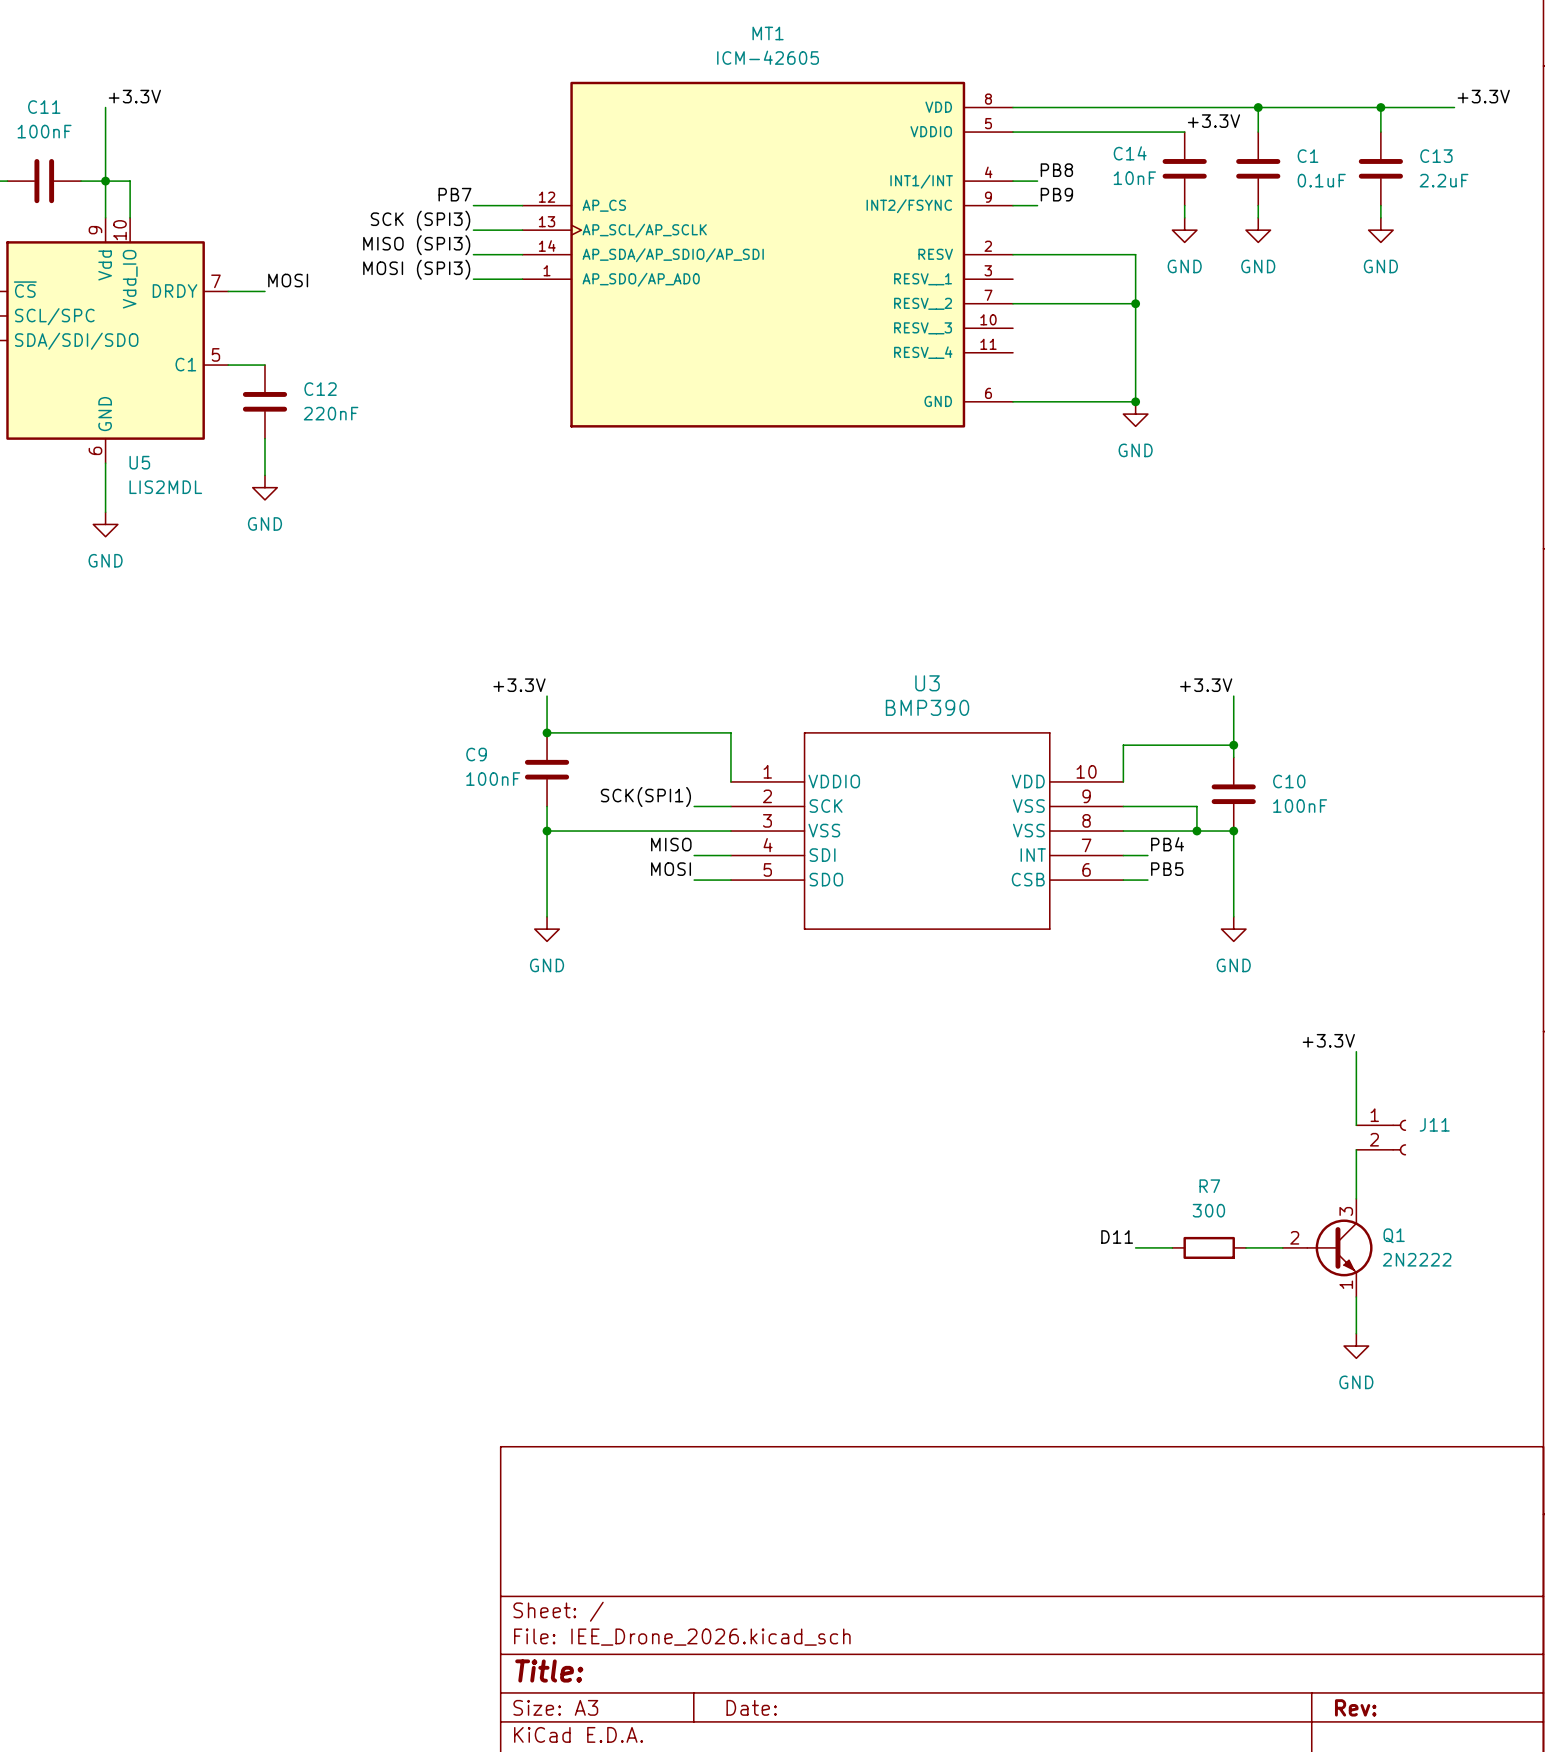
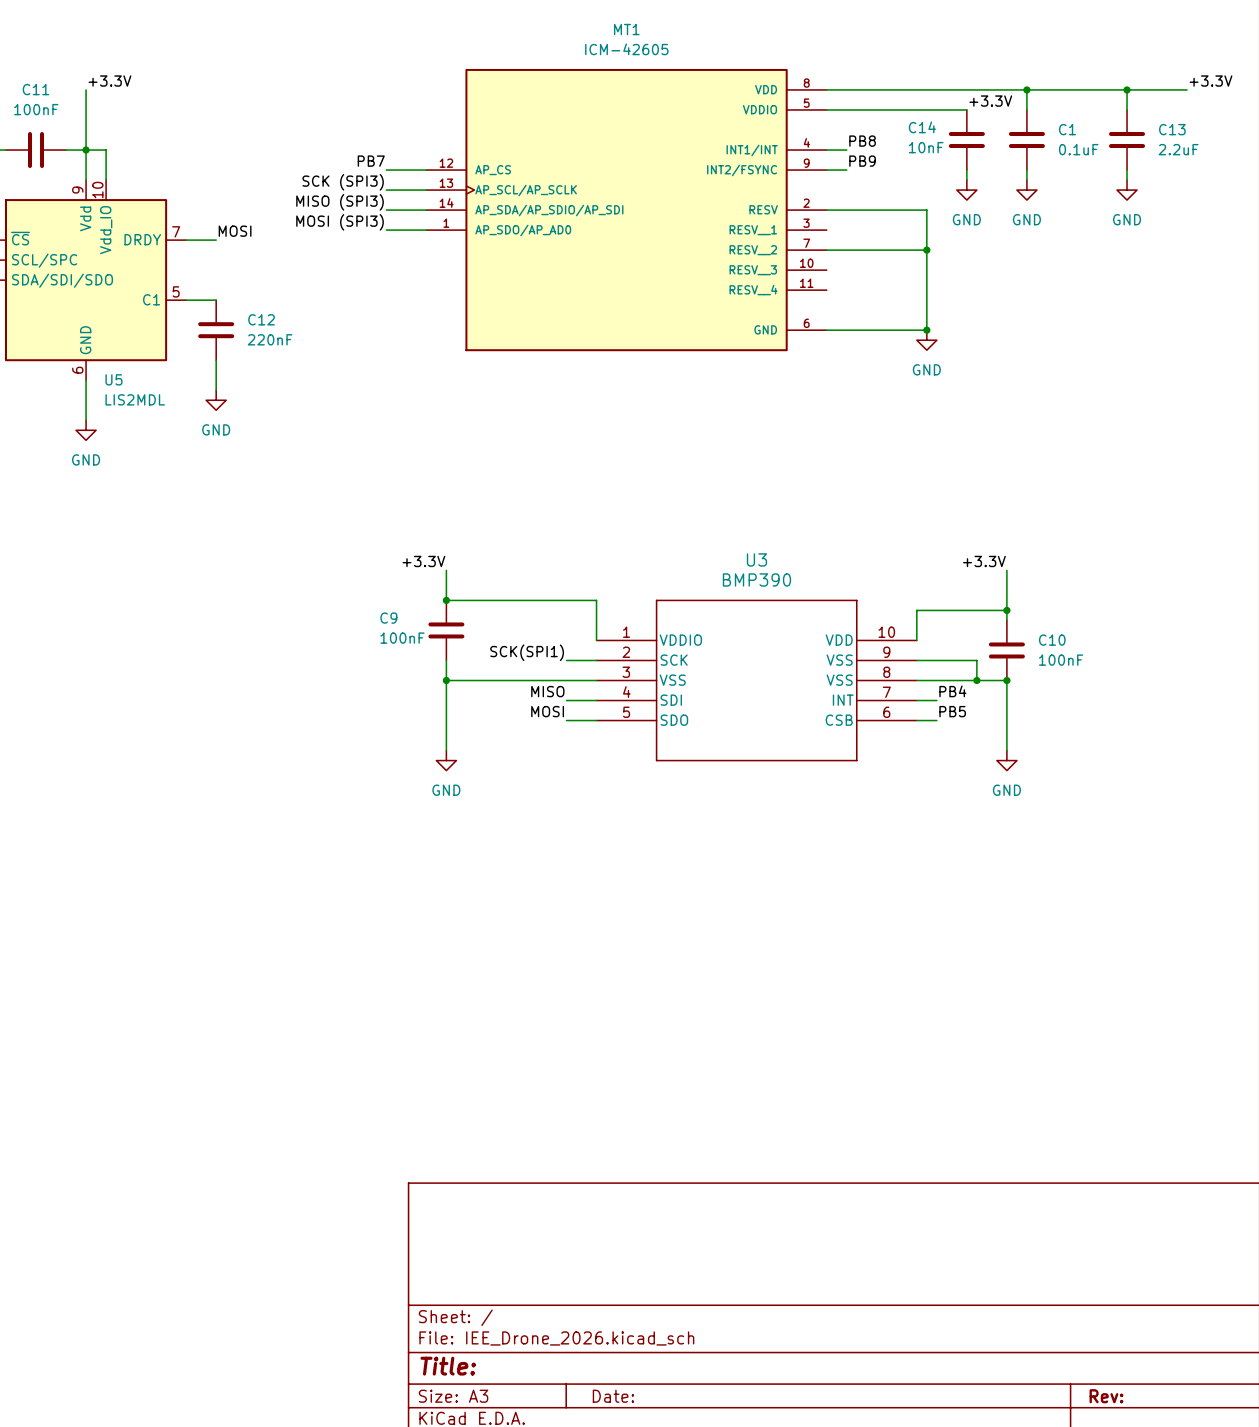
label: +3.3V (1328, 1040) -> none
wire: (1356, 1051) (1356, 1125) -> none
J11: (1381, 1137) -> none
wire: (1356, 1149) (1356, 1198) -> none
label: D11 (1117, 1237) -> none
wire: (1135, 1247) (1172, 1247) -> none
R7: 300 (1209, 1247) -> none
wire: (1245, 1247) (1282, 1247) -> none
Q1: 2N2222 (1327, 1247) -> none
wire: (1356, 1296) (1356, 1333) -> none
power symbol: GND (1356, 1346) -> none

